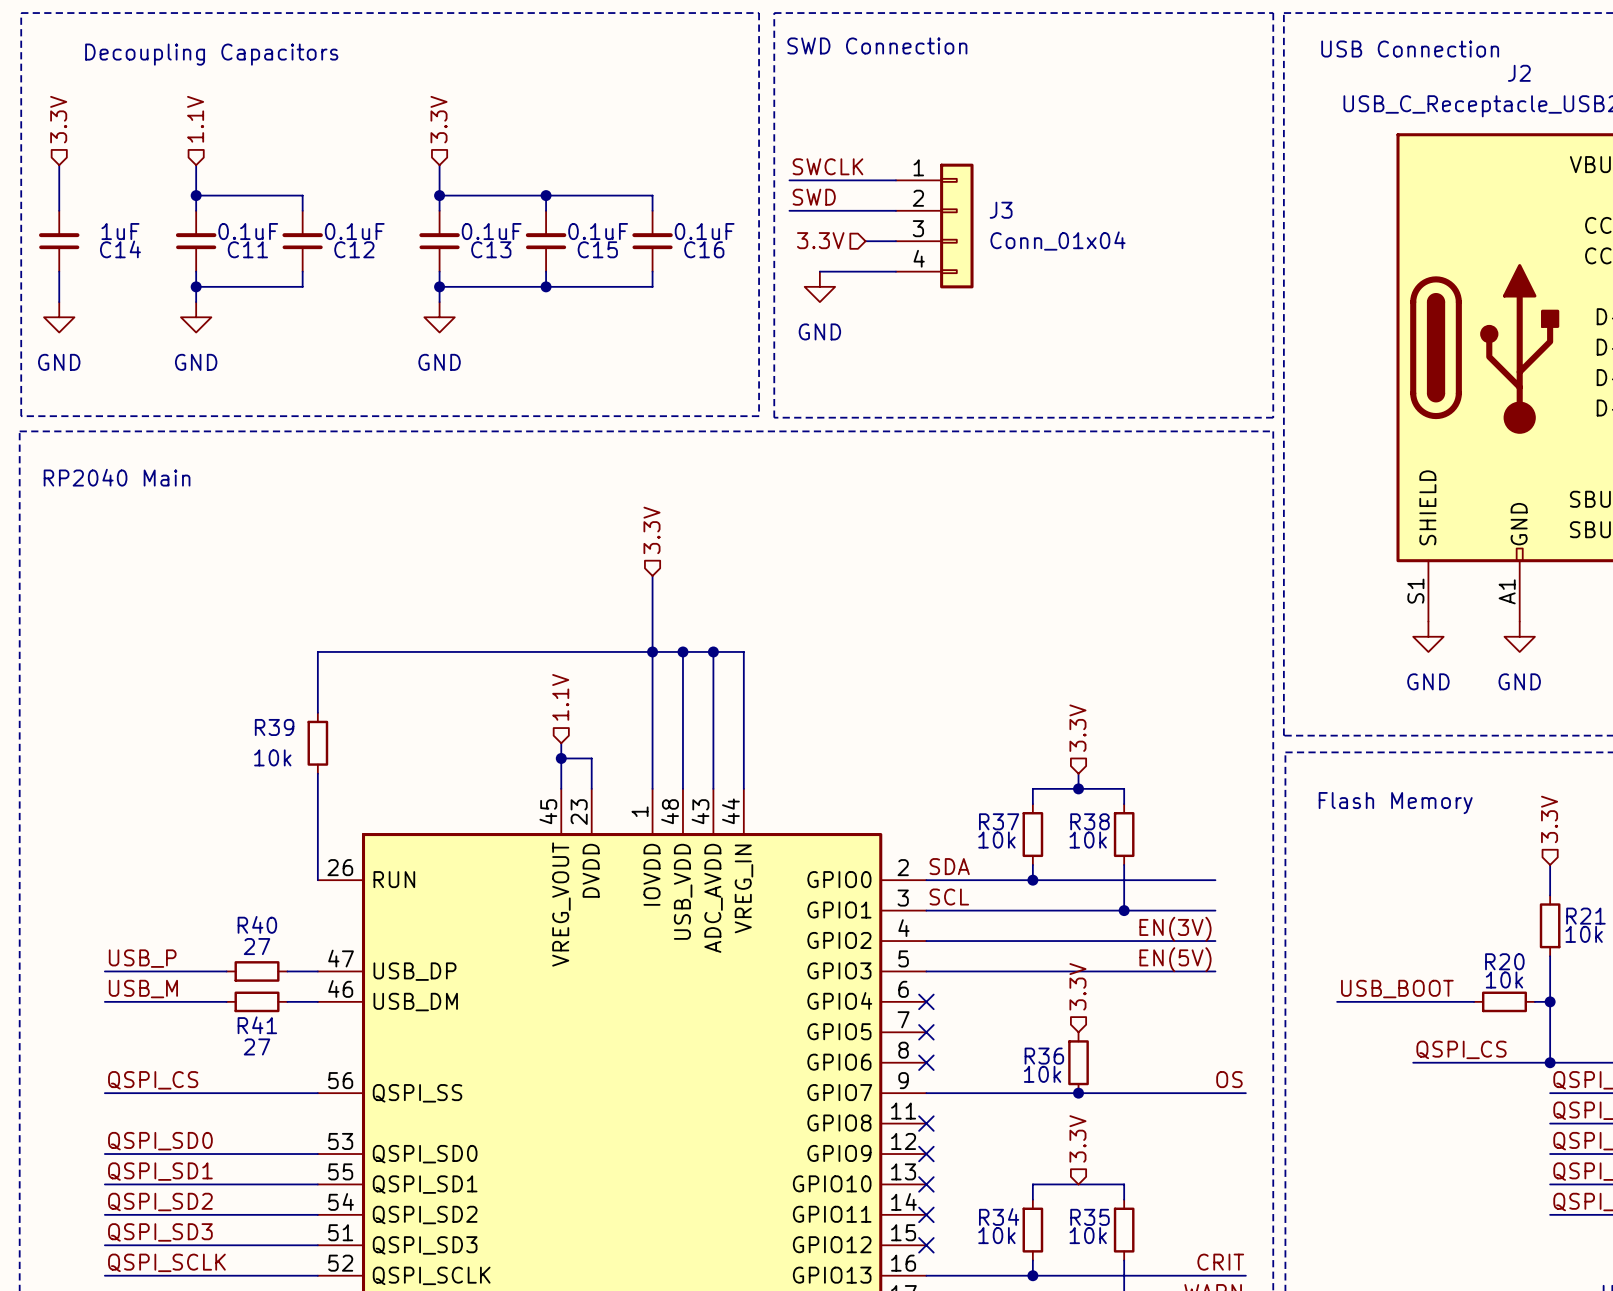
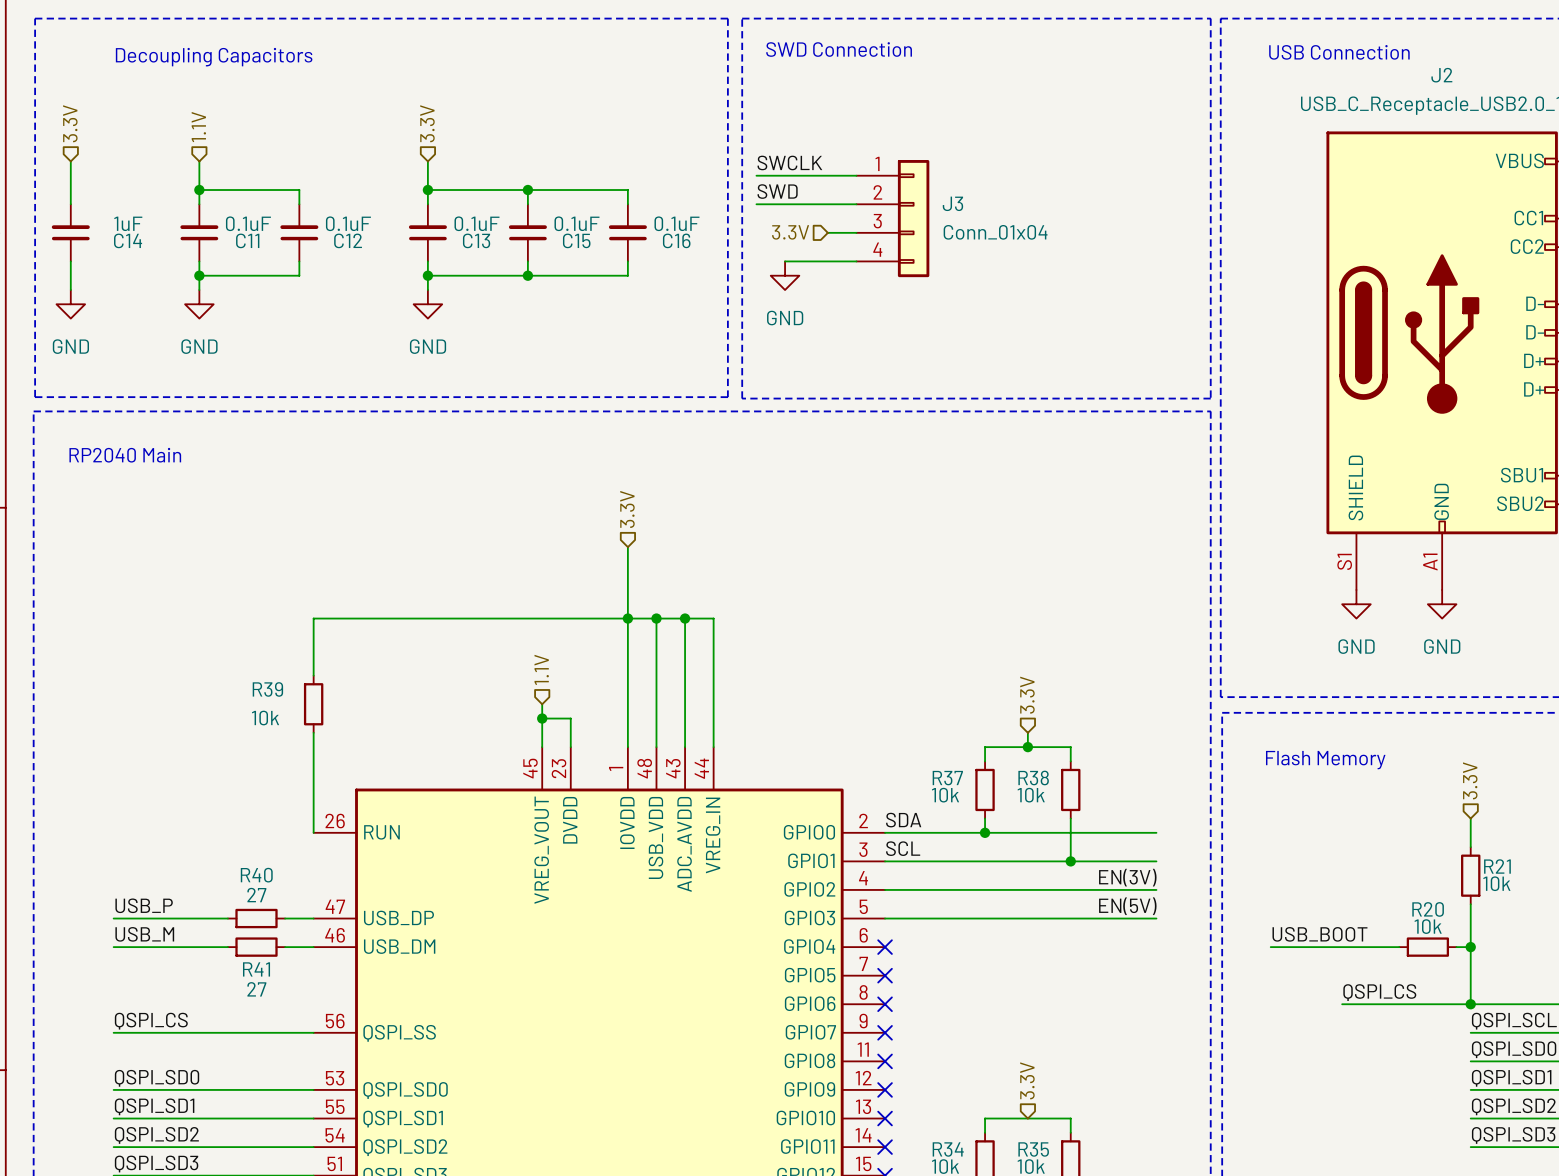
hierarchical label: 3.3V (1077, 986) -> none
R36: 10k (1078, 1062) -> none
label: OS (1229, 1079) -> none
wire: (926, 1093) (1245, 1093) -> none
no-connect mark: none -> (885, 1032)
junction: (1078, 1093) -> none

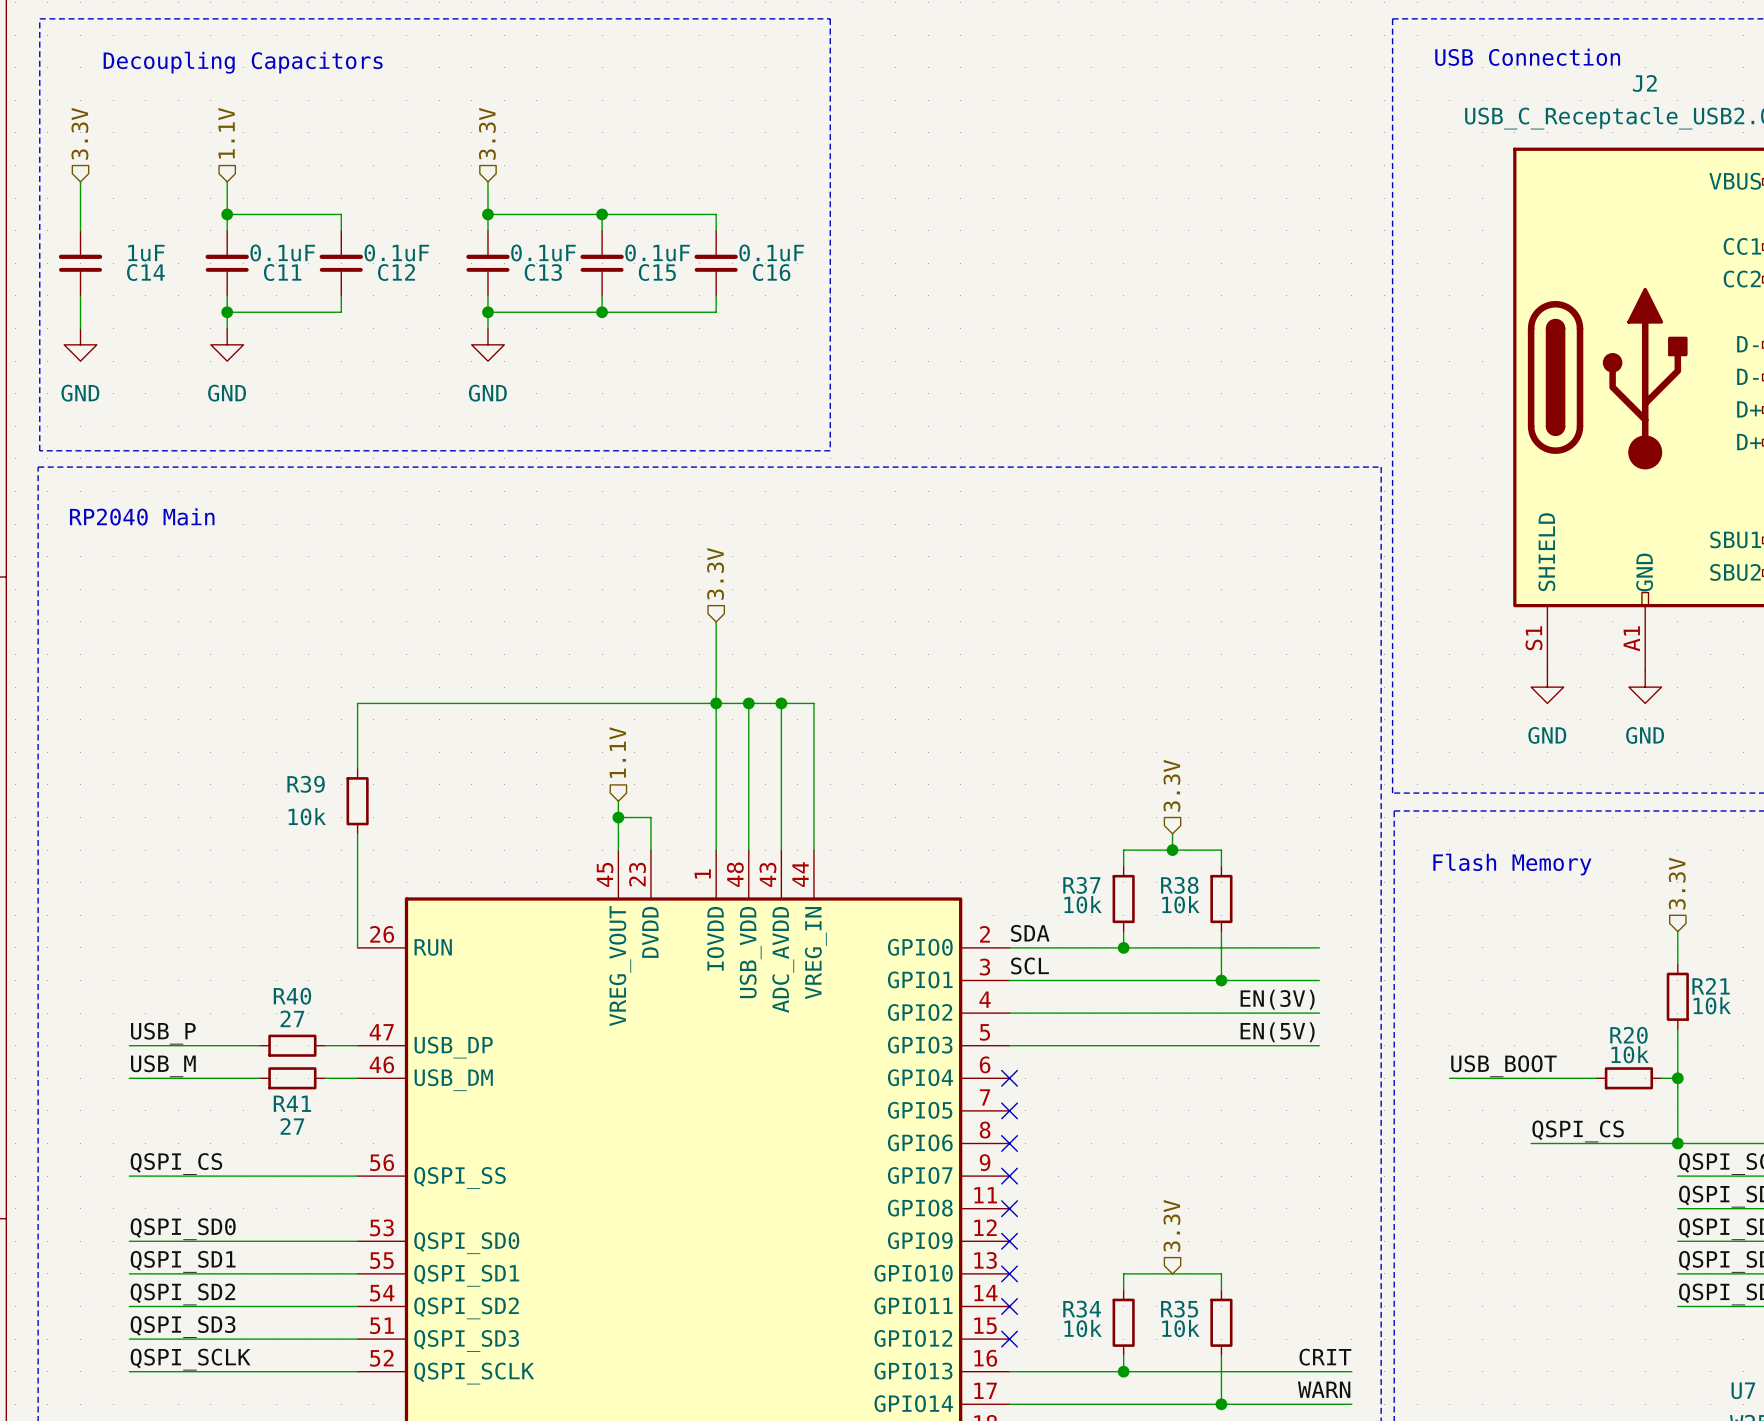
line: (742, 18) (1210, 18) (1210, 398) (742, 398) (742, 18) -> none
text: SWD Connection (839, 49) -> none
label: SWCLK (789, 162) -> none
wire: (756, 175) (856, 175) -> none
label: SWD (777, 191) -> none
wire: (756, 204) (856, 204) -> none
J3: Conn_01x04 (892, 218) -> none
hierarchical label: 3.3V (790, 232) -> none
wire: (827, 232) (856, 232) -> none
wire: (785, 261) (856, 261) -> none
power symbol: GND (785, 275) -> none

